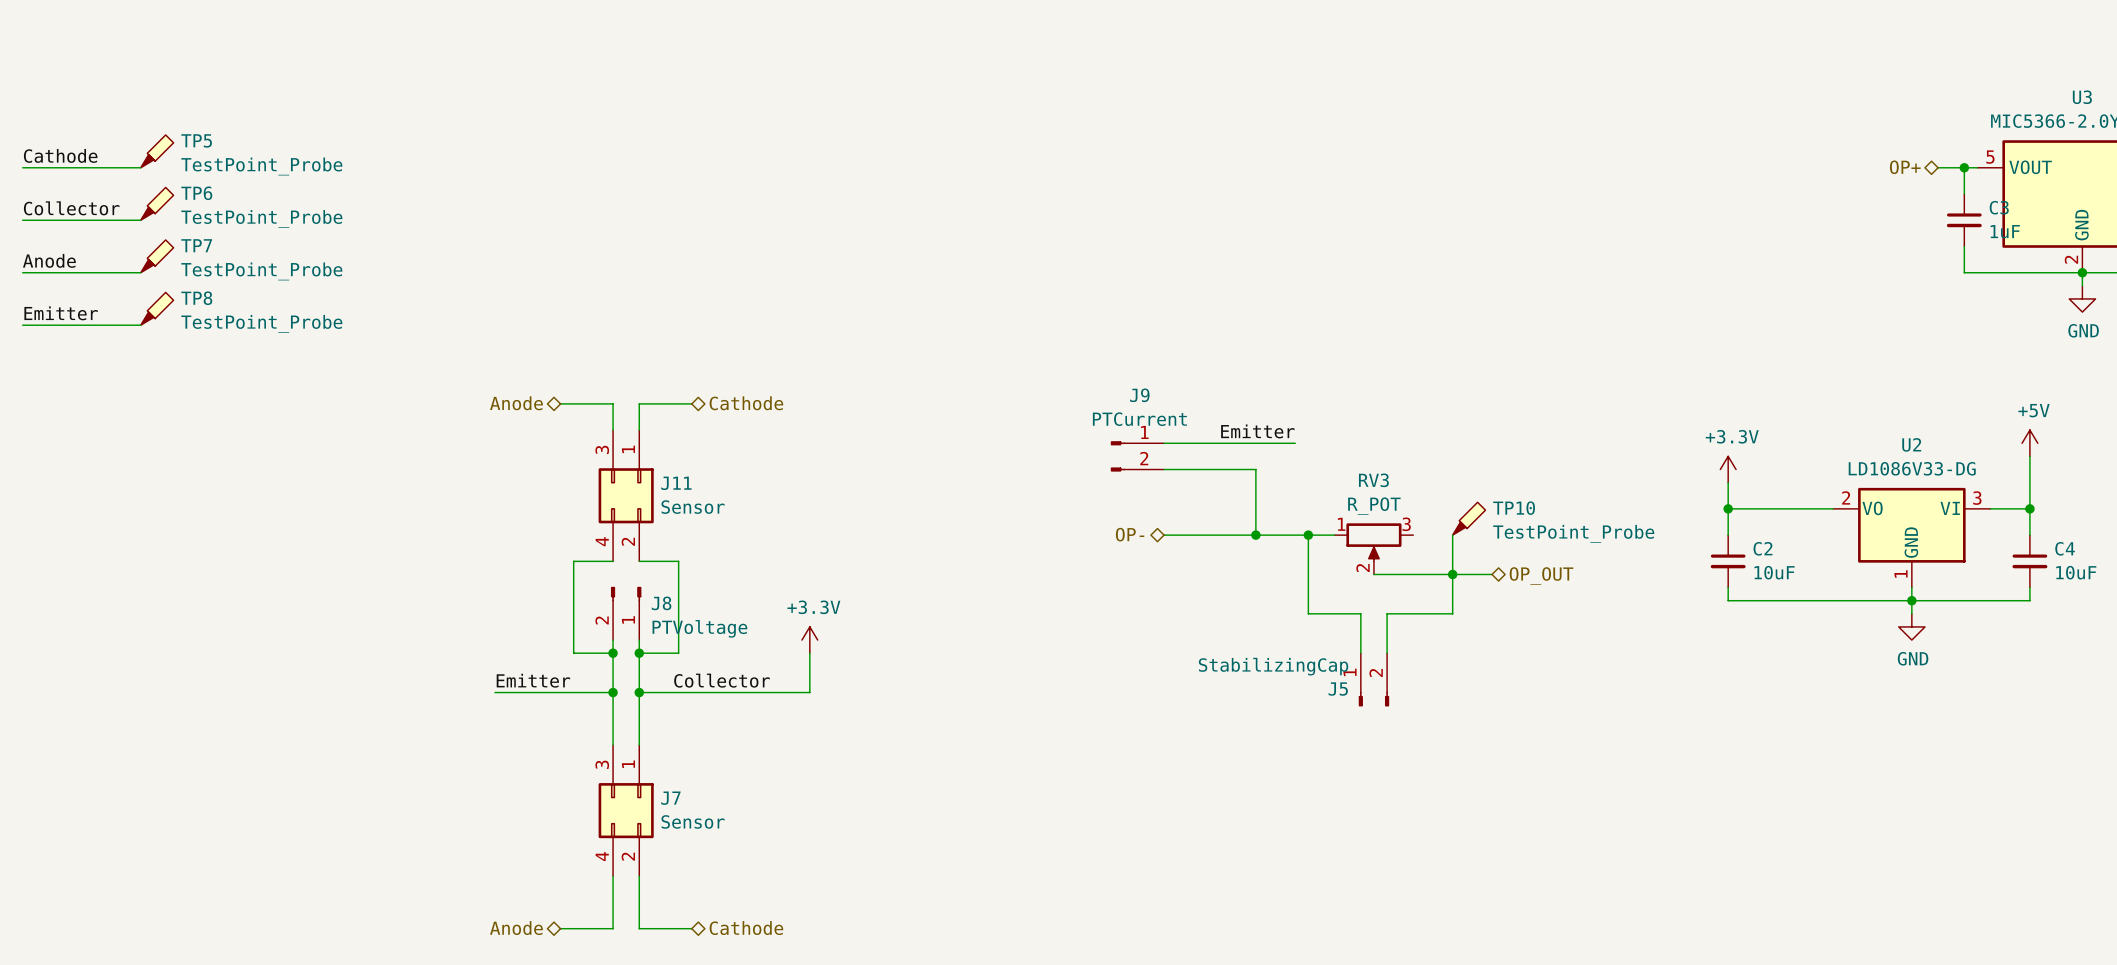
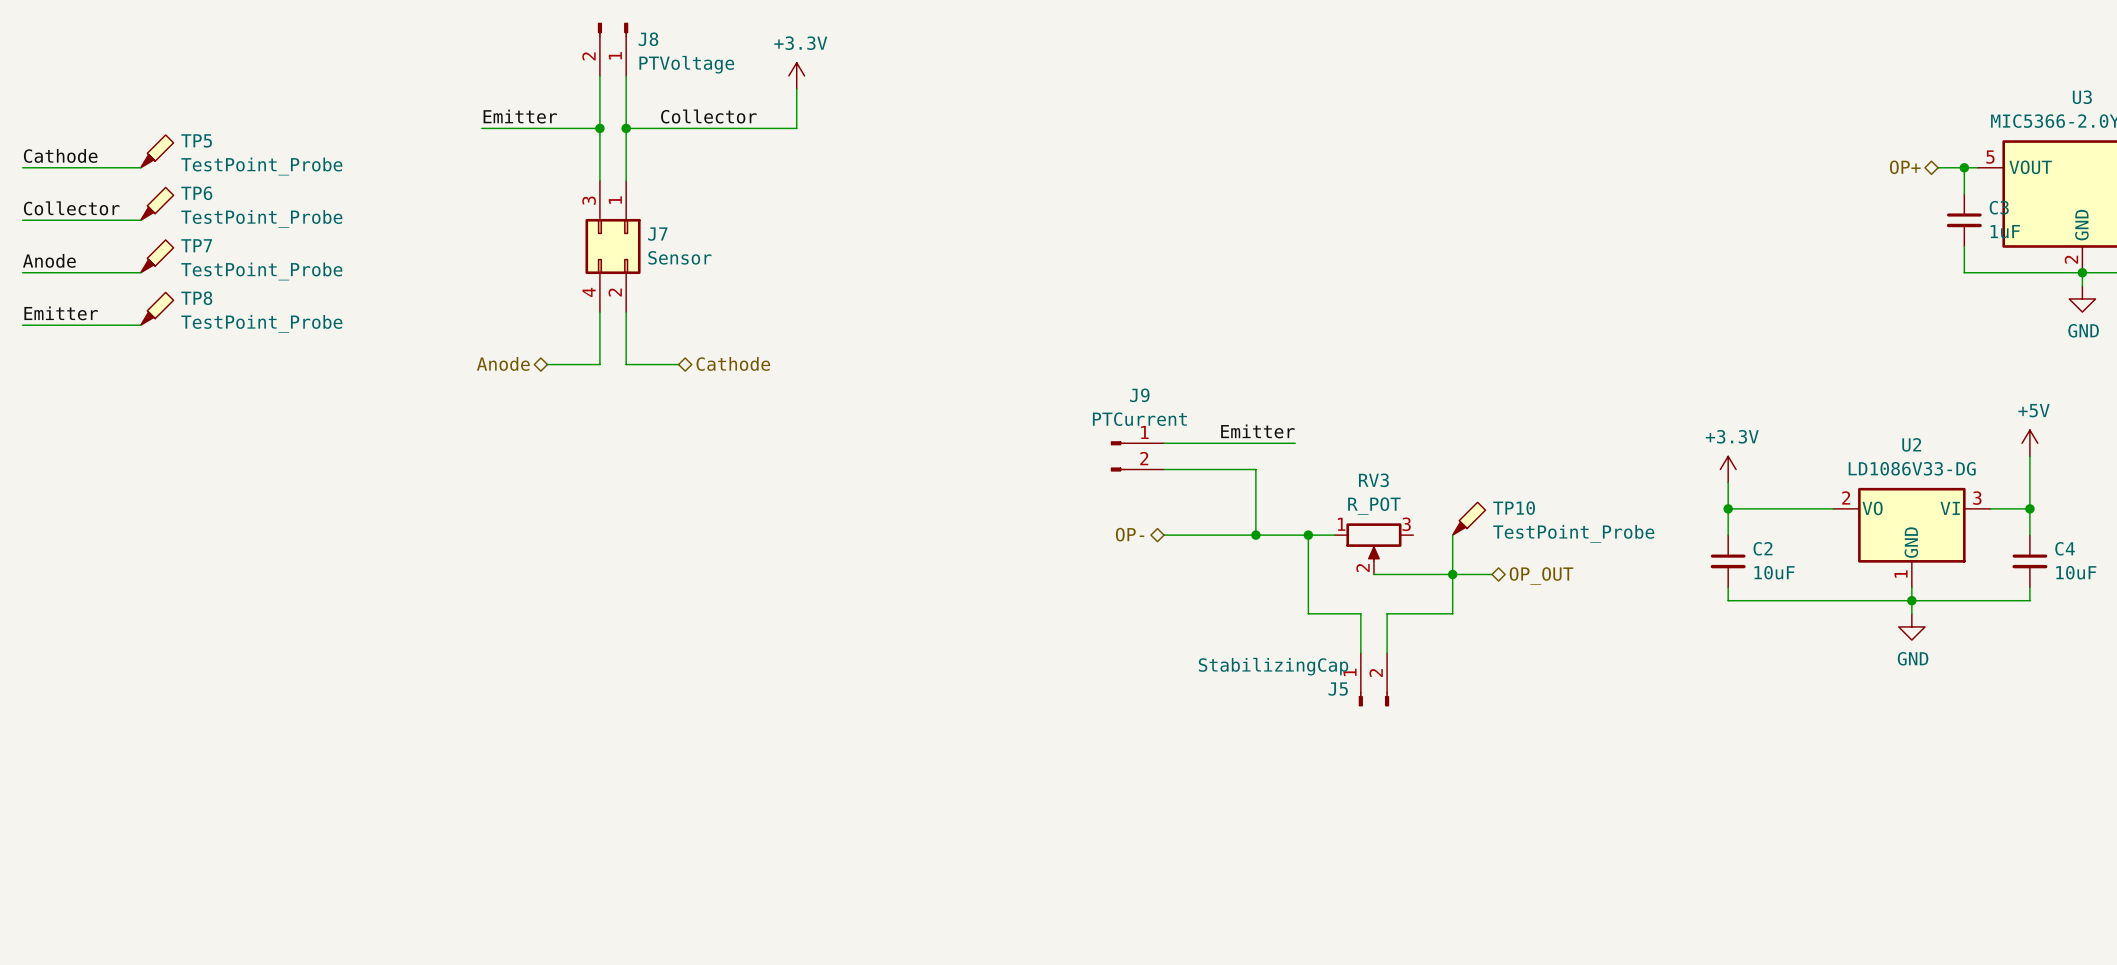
wire: none -> (599, 75) (599, 180)
wire: none -> (626, 75) (626, 180)
power symbol: none -> +3.3V (796, 75)
wire: none -> (796, 89) (796, 128) (626, 128)
label: none -> Emitter (520, 116)
label: none -> Collector (708, 116)
wire: none -> (481, 128) (599, 128)
junction: none -> (599, 128)
junction: none -> (626, 128)
wire: none -> (599, 312) (599, 364) (547, 364)
wire: none -> (626, 312) (626, 364) (678, 364)
hierarchical label position: Anode (516, 403) -> Anode (503, 363)
wire: (560, 403) (613, 403) (613, 430) -> none
wire: (691, 403) (639, 403) (639, 430) -> none
hierarchical label position: Cathode (746, 403) -> Cathode (733, 363)
J11: Sensor (626, 495) -> none
wire: (613, 561) (573, 561) (573, 653) (613, 653) -> none
wire: (639, 561) (678, 561) (678, 653) (639, 653) -> none
J8 position: (626, 613) -> (613, 49)
wire: (613, 640) (613, 745) -> none
wire: (639, 640) (639, 745) -> none
power symbol: +3.3V (809, 640) -> none
junction: (613, 653) -> none
junction: (639, 653) -> none
wire: (809, 653) (809, 692) (639, 692) -> none
label: Emitter (533, 680) -> none
label: Collector (721, 680) -> none
wire: (494, 692) (613, 692) -> none
junction: (613, 692) -> none
junction: (639, 692) -> none
J7 position: (626, 810) -> (613, 246)
wire: (613, 876) (613, 928) (560, 928) -> none
wire: (639, 876) (639, 928) (691, 928) -> none
hierarchical label: Anode (516, 928) -> none
hierarchical label: Cathode (746, 928) -> none

